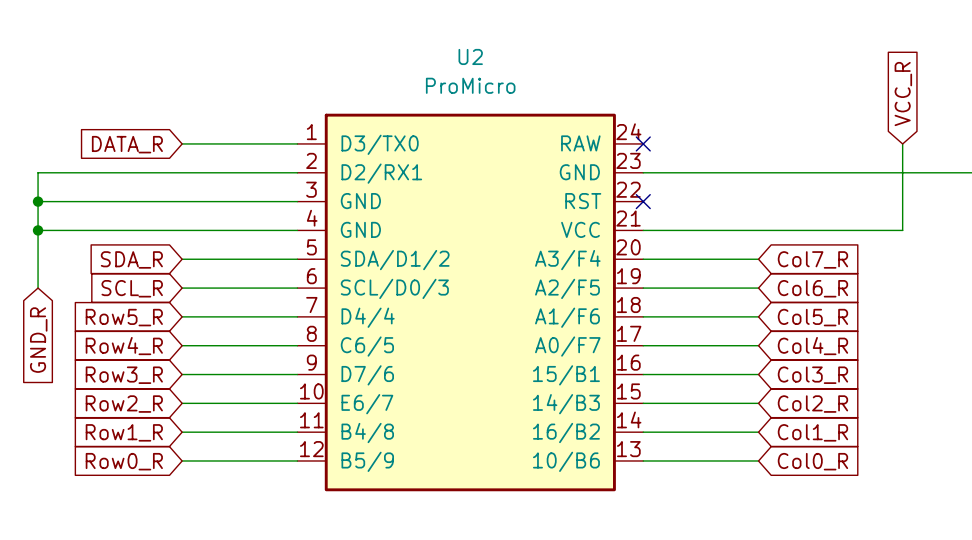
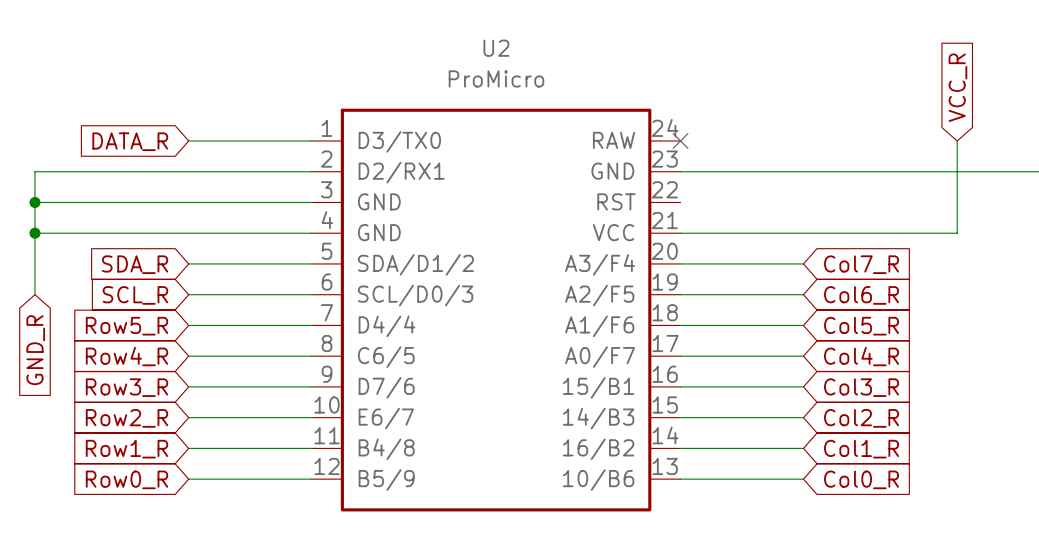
no-connect mark: (643, 201) -> none

